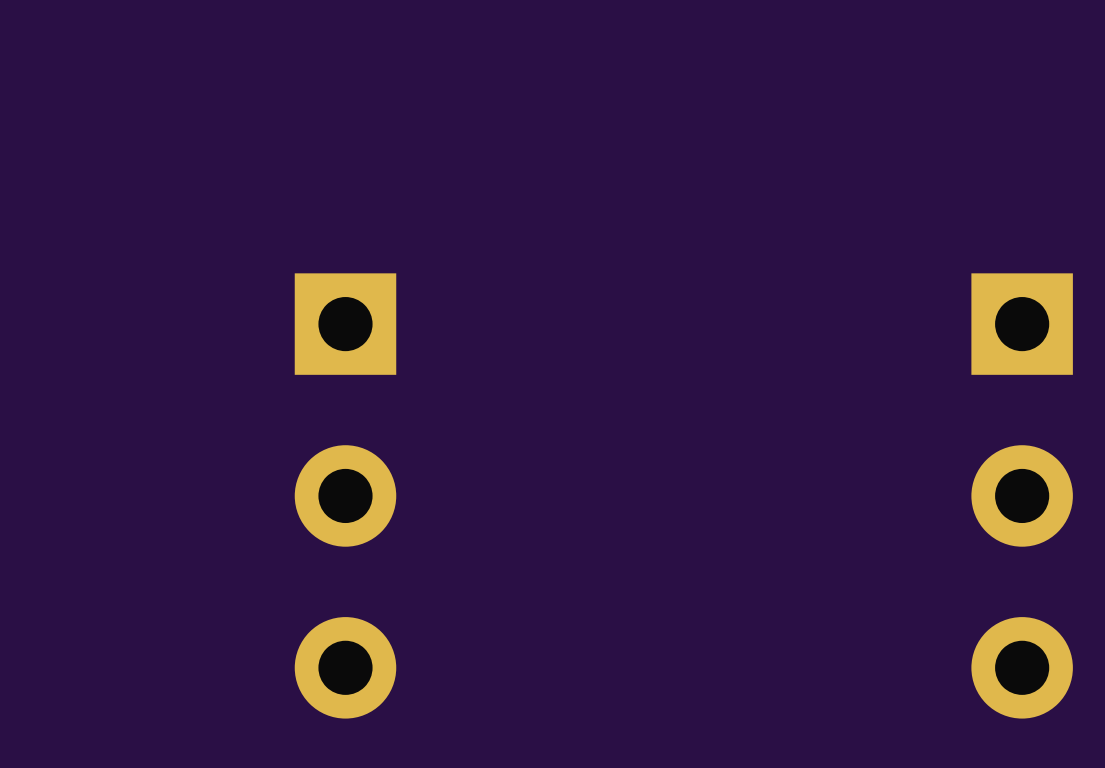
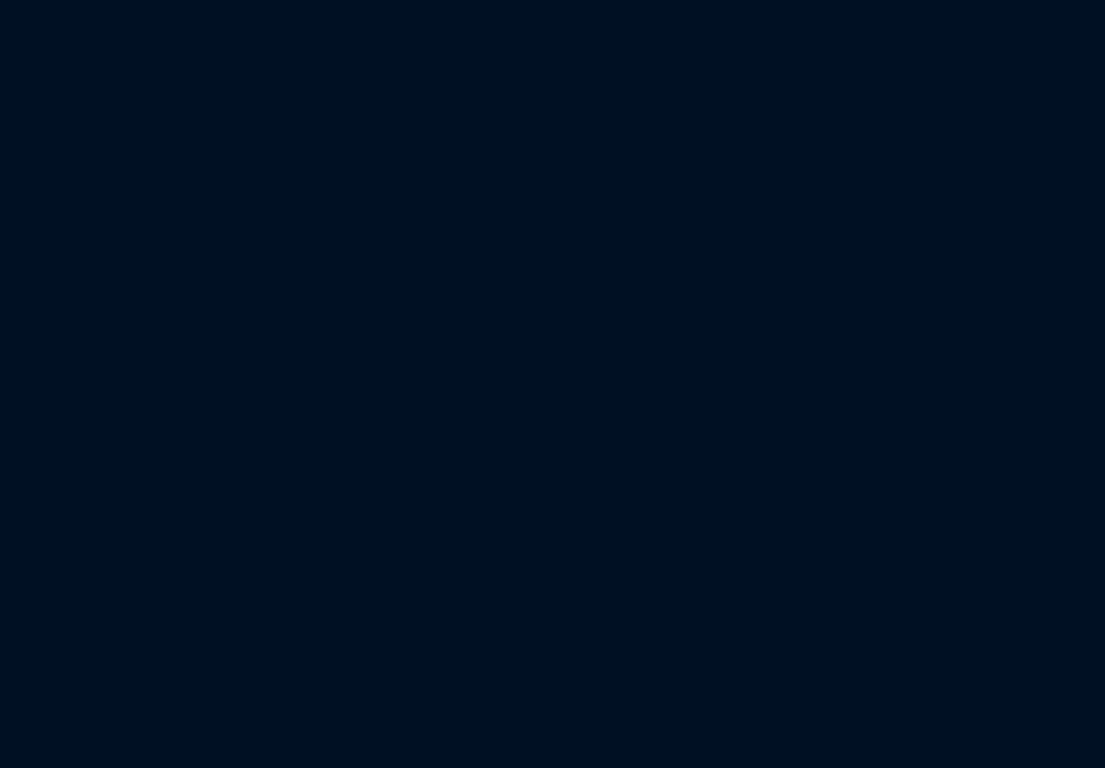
part: (345, 495) -> none
part: (1022, 495) -> none

